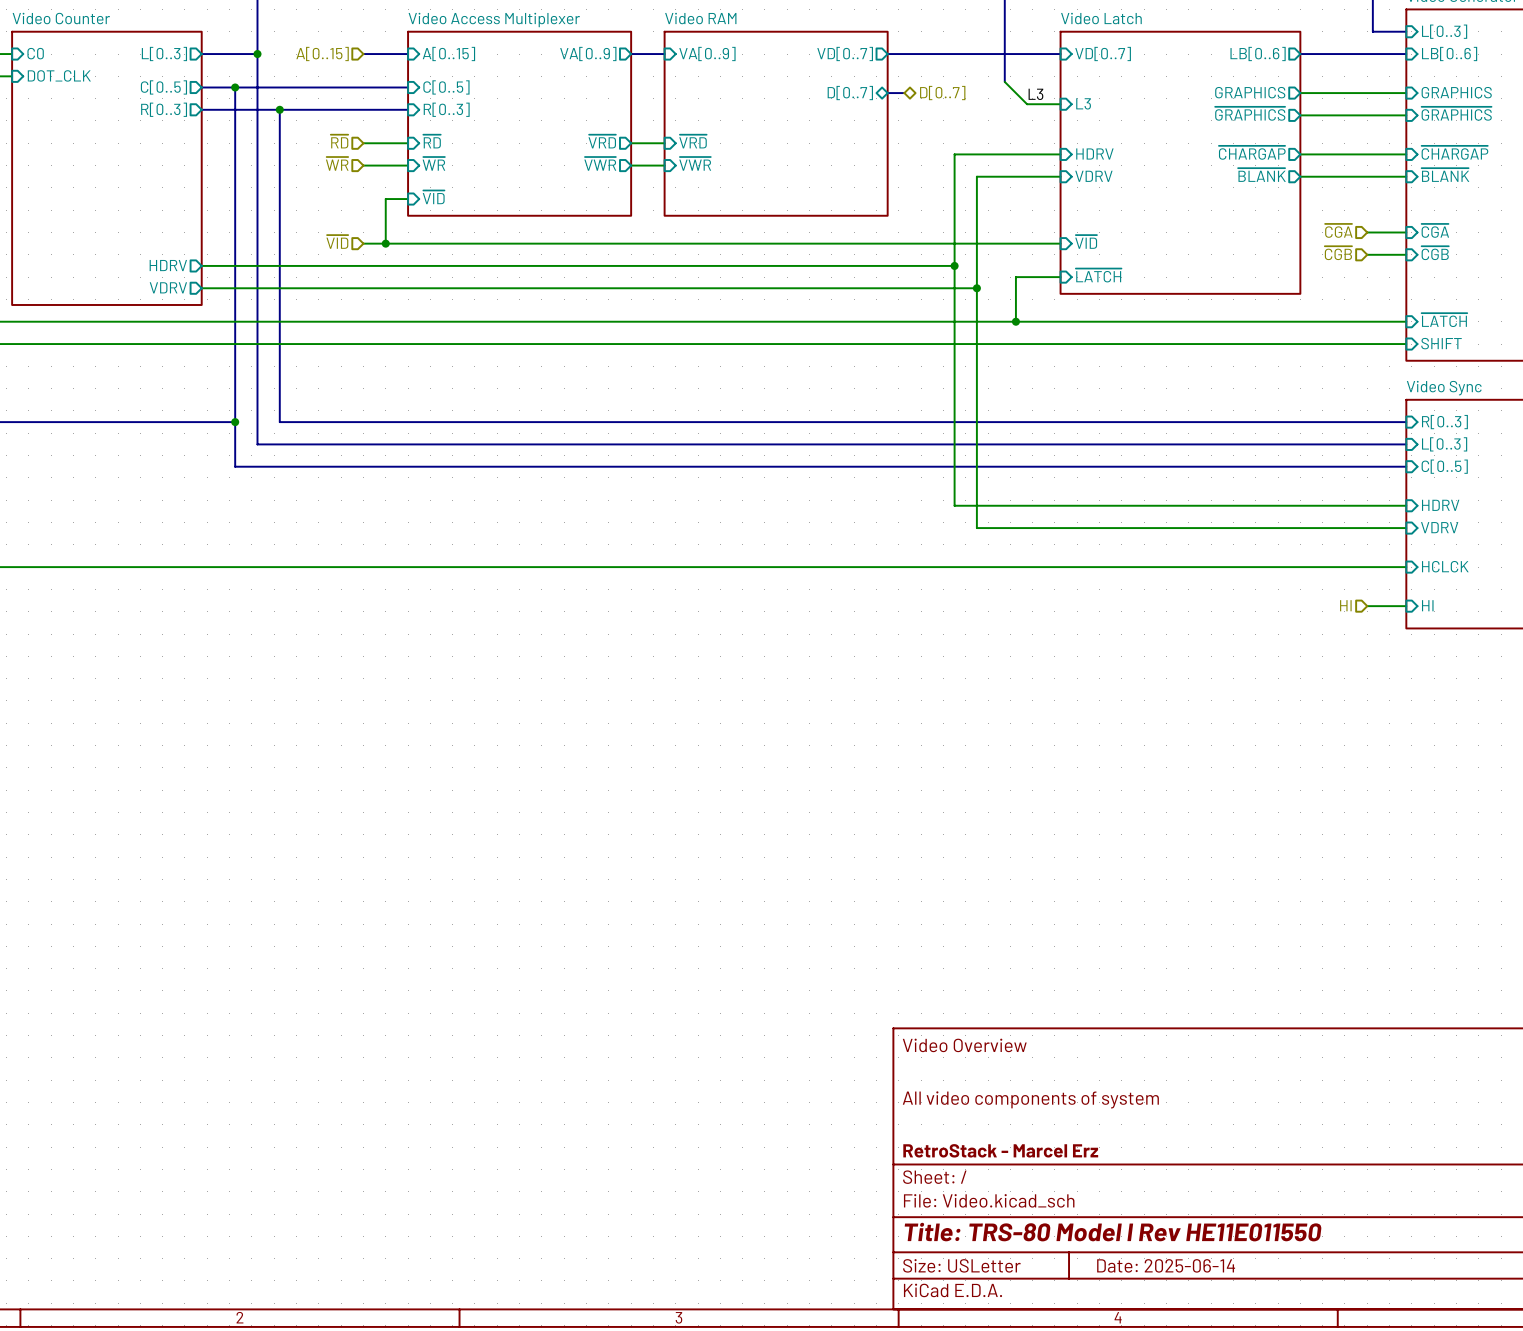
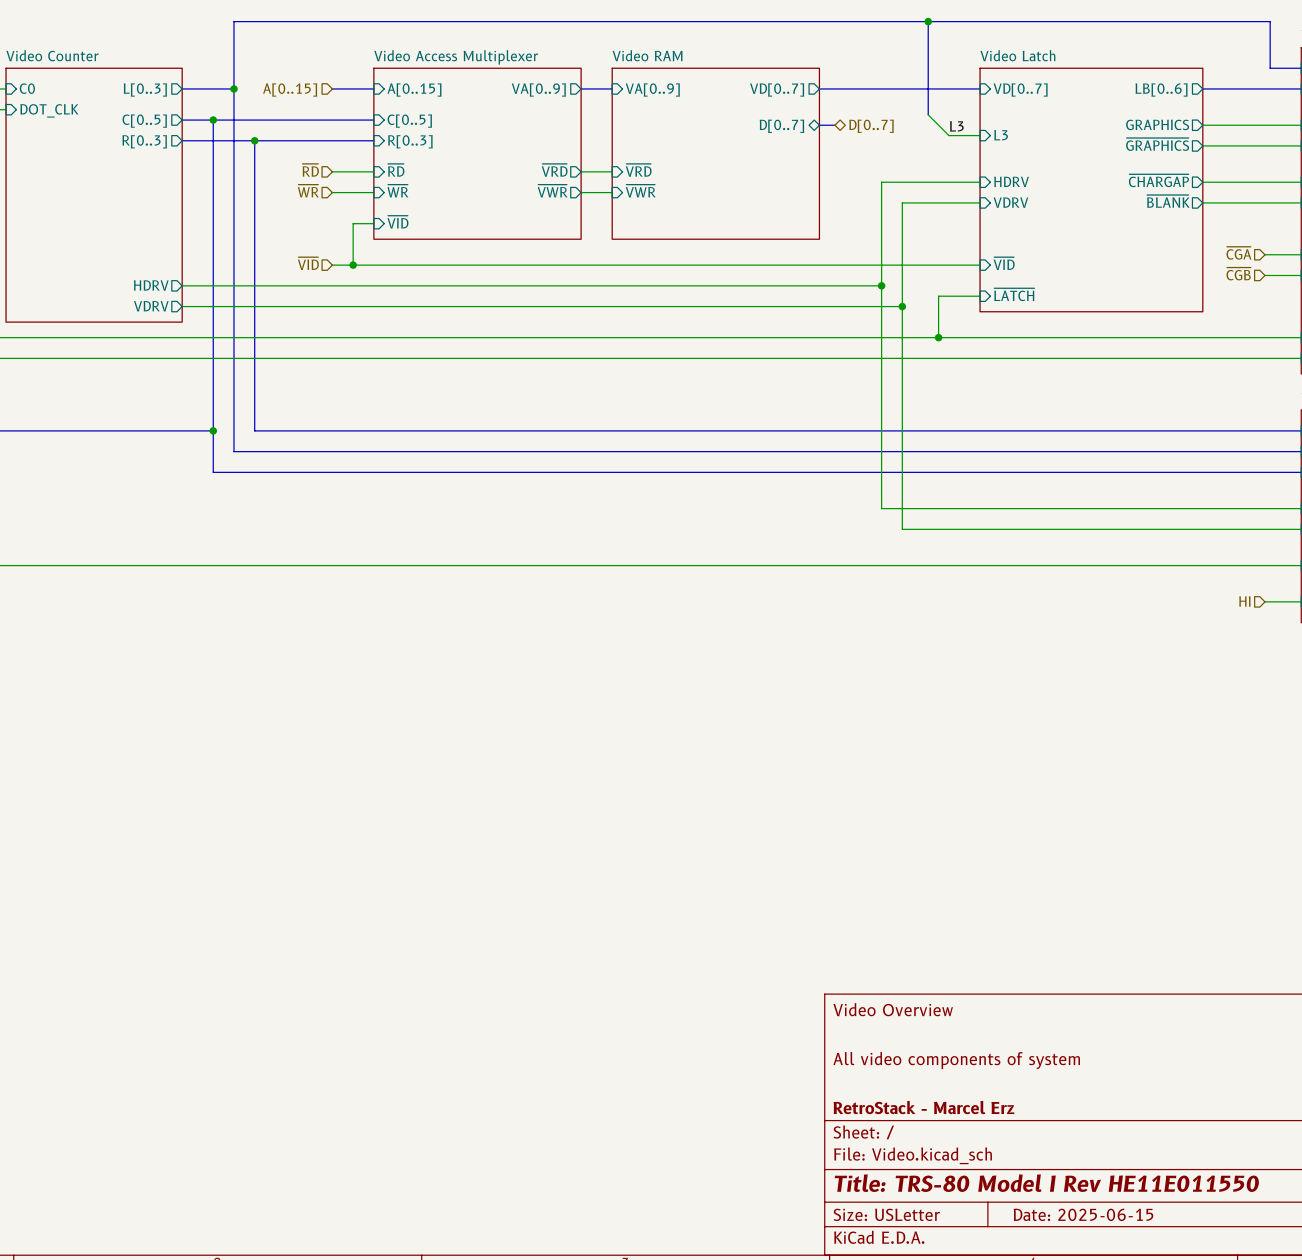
title block: Date: 2025-06-14 (1166, 1265) -> Date: 2025-06-15 (1083, 1214)

